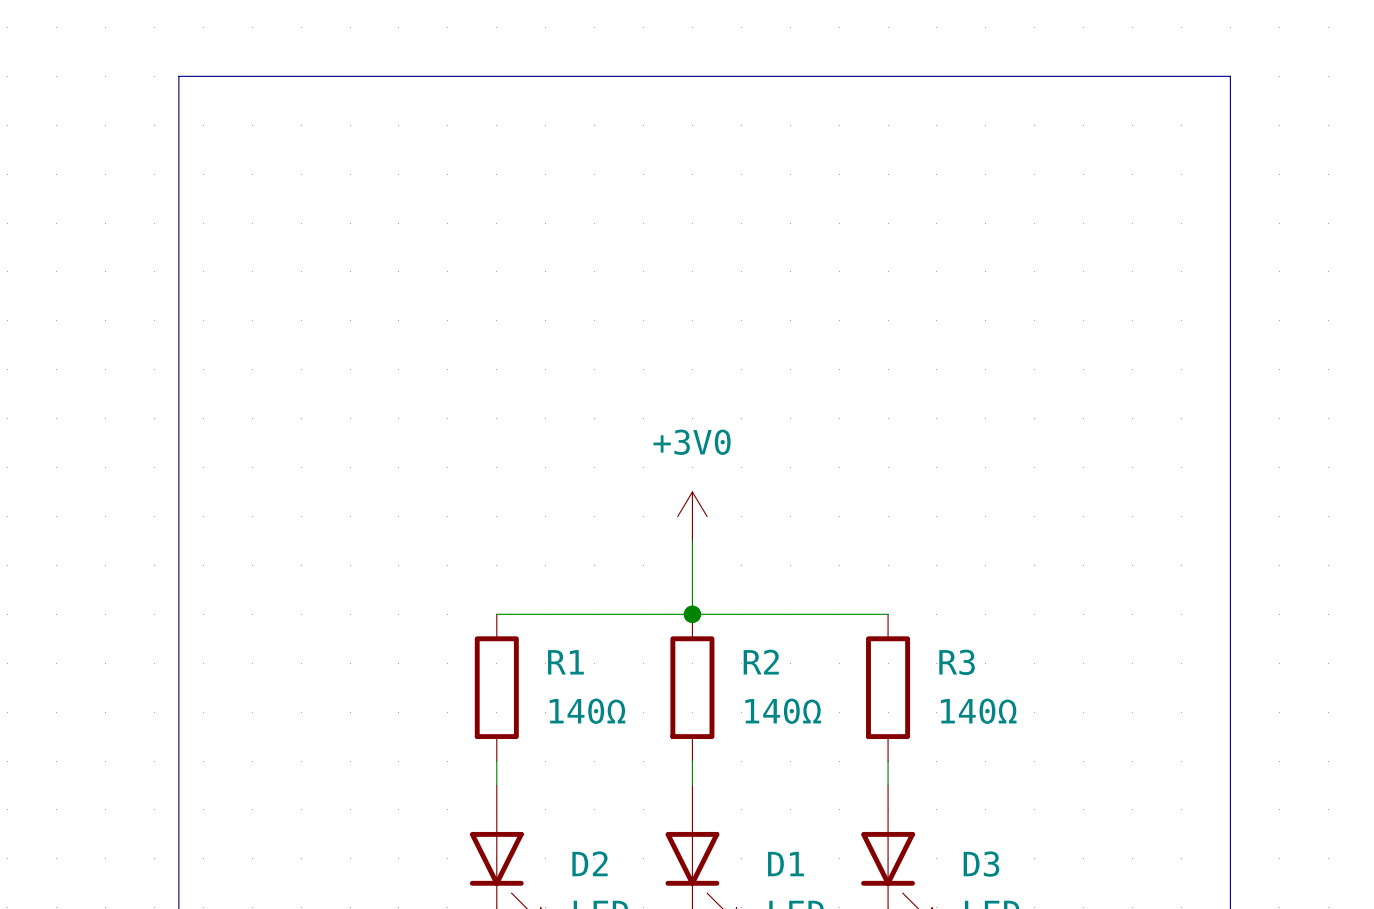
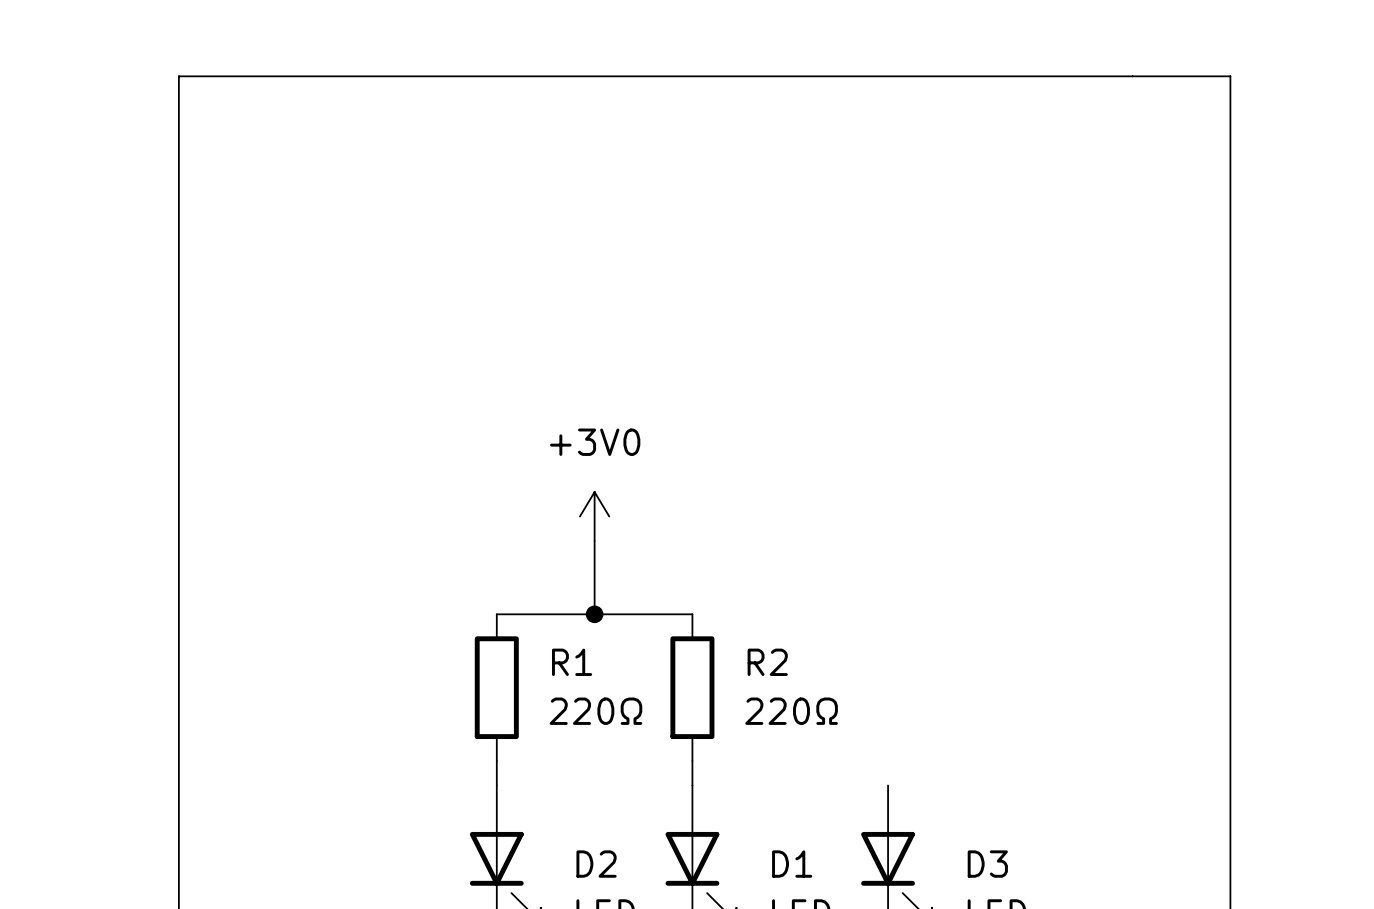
power symbol position: +3V0 (692, 516) -> +3V0 (594, 516)
wire: none -> (594, 540) (594, 614)
wire: (692, 540) (692, 614) (888, 614) -> none
junction position: (692, 614) -> (594, 614)
R3: 140Ω (888, 687) -> none
R1 value: 140Ω (587, 711) -> 220Ω (595, 711)
R2 value: 140Ω (783, 711) -> 220Ω (791, 711)
wire: (888, 761) (888, 785) -> none

